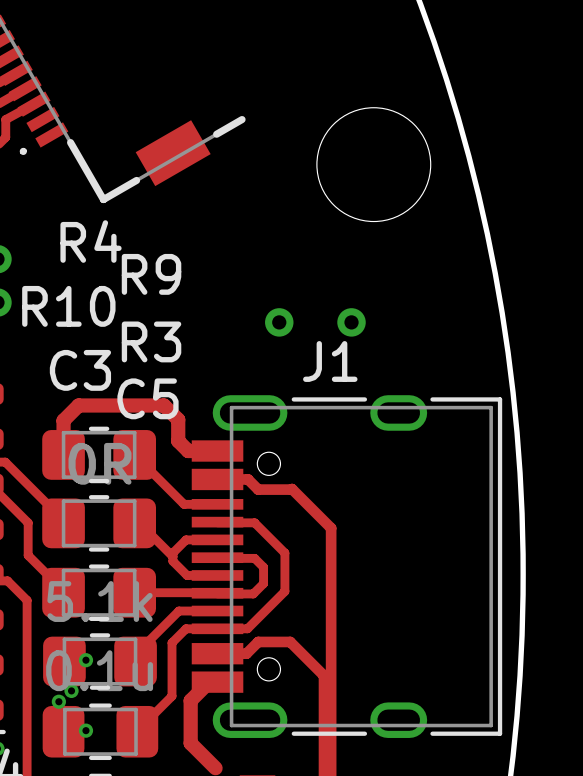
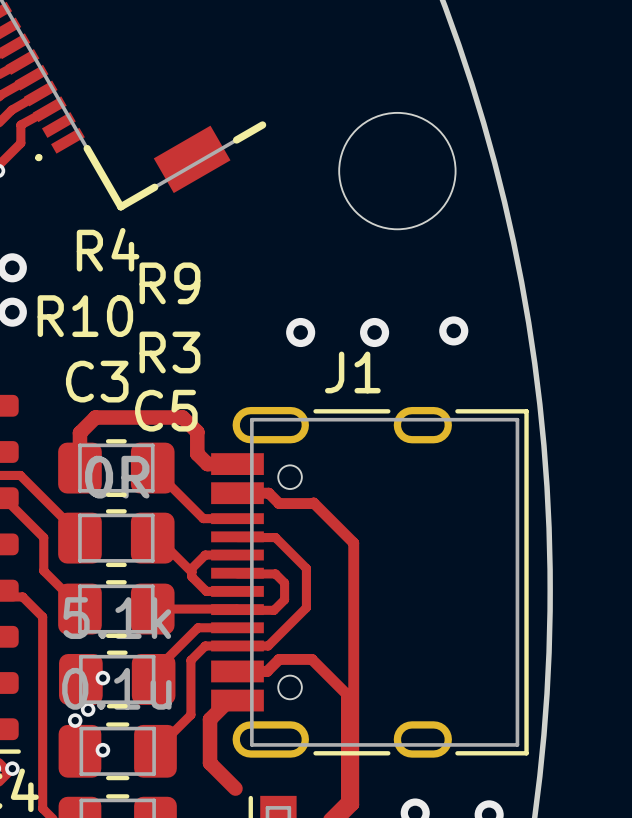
via: none -> (453, 330)

